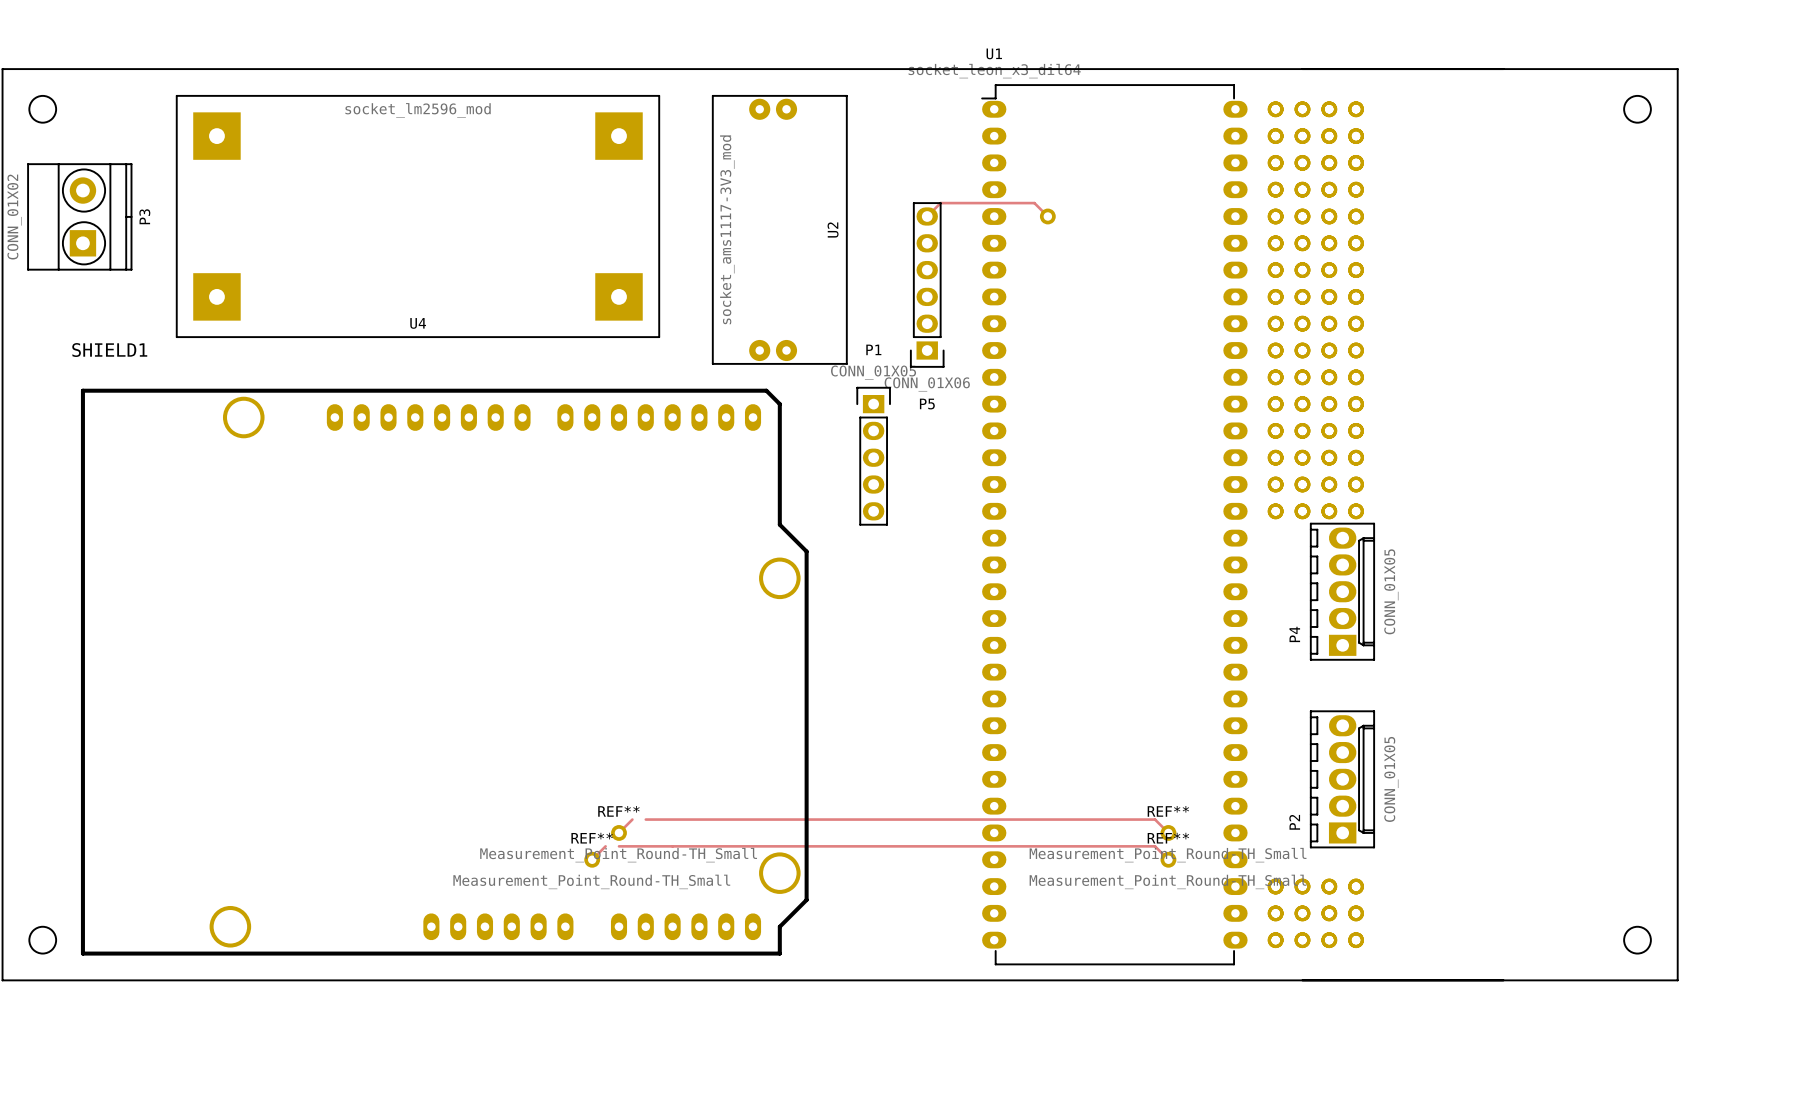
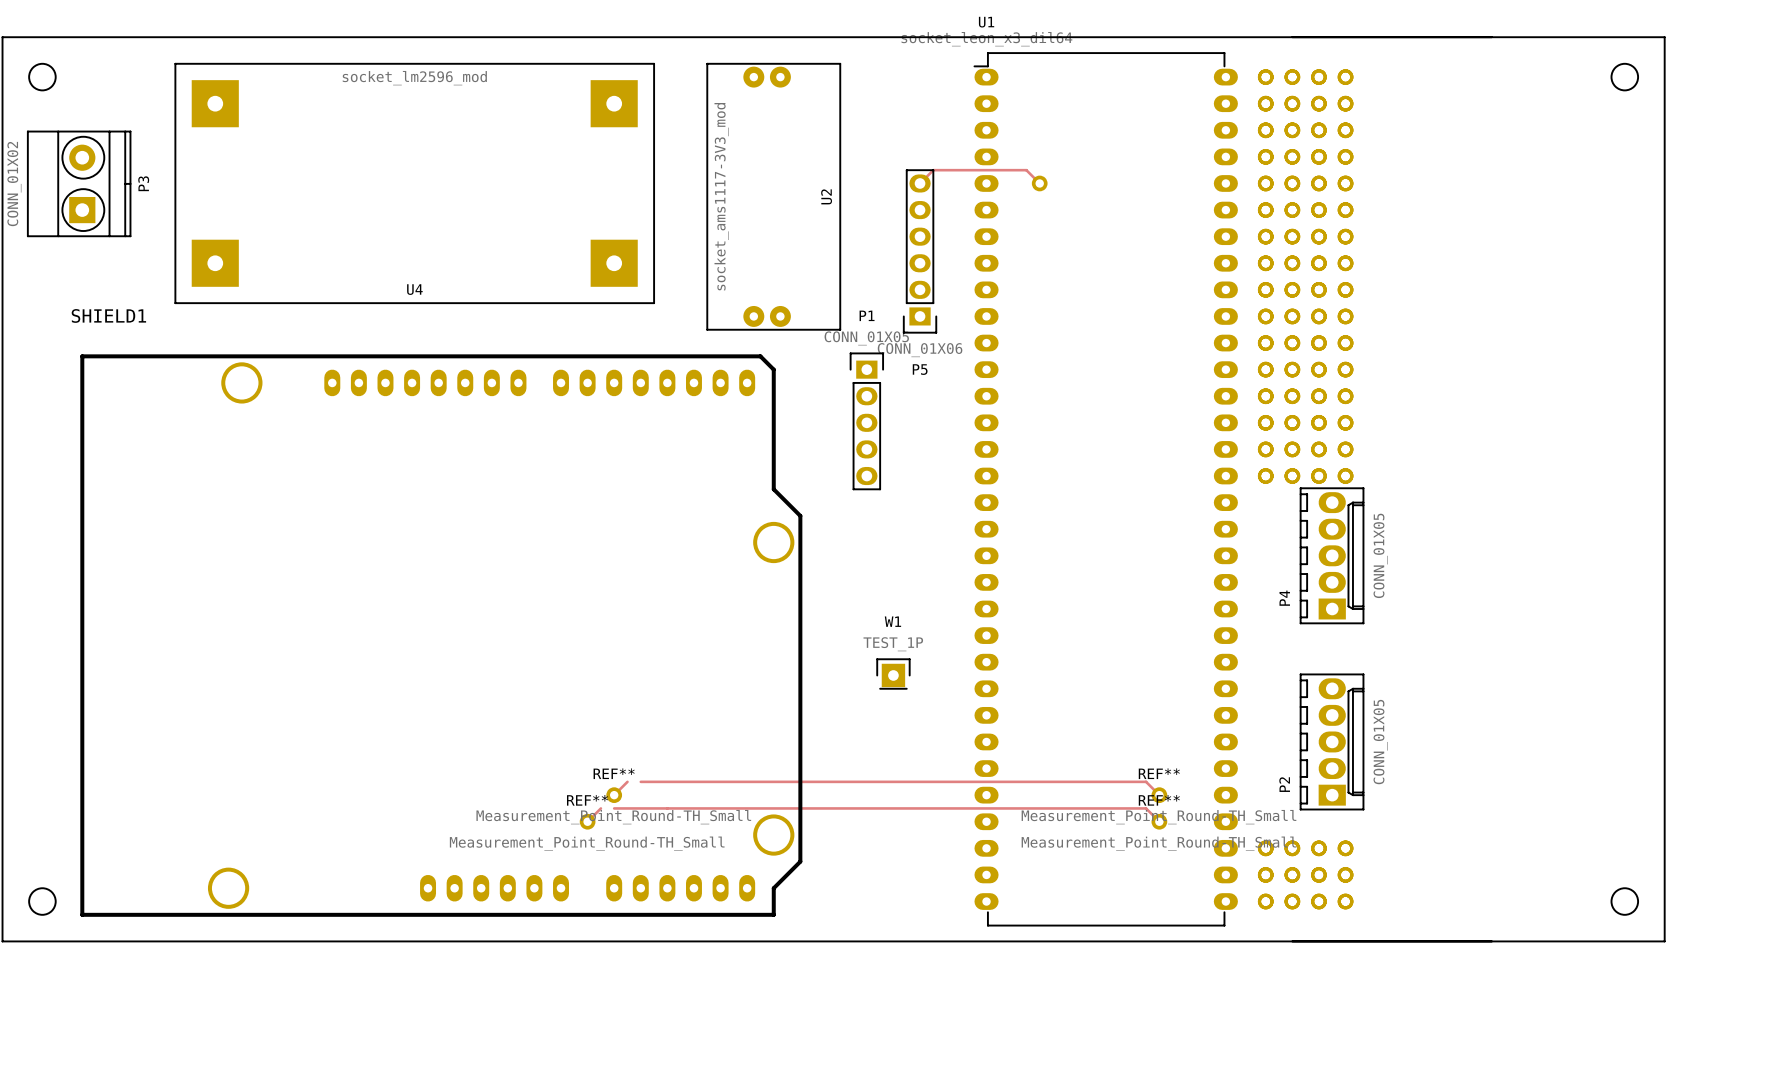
W1: none -> TEST_1P (893, 674)

